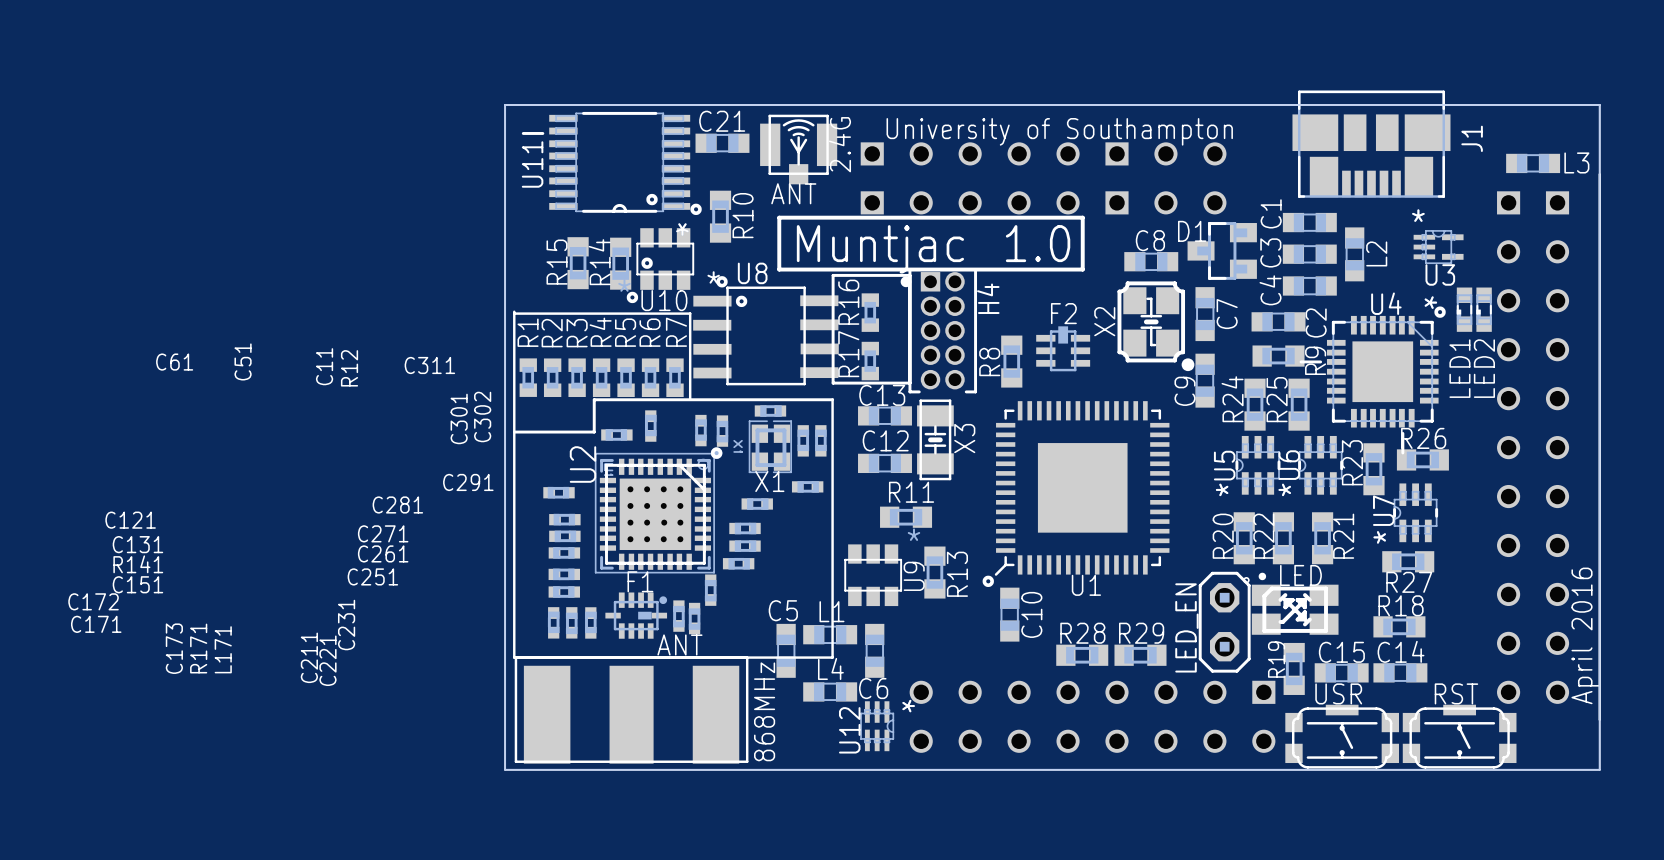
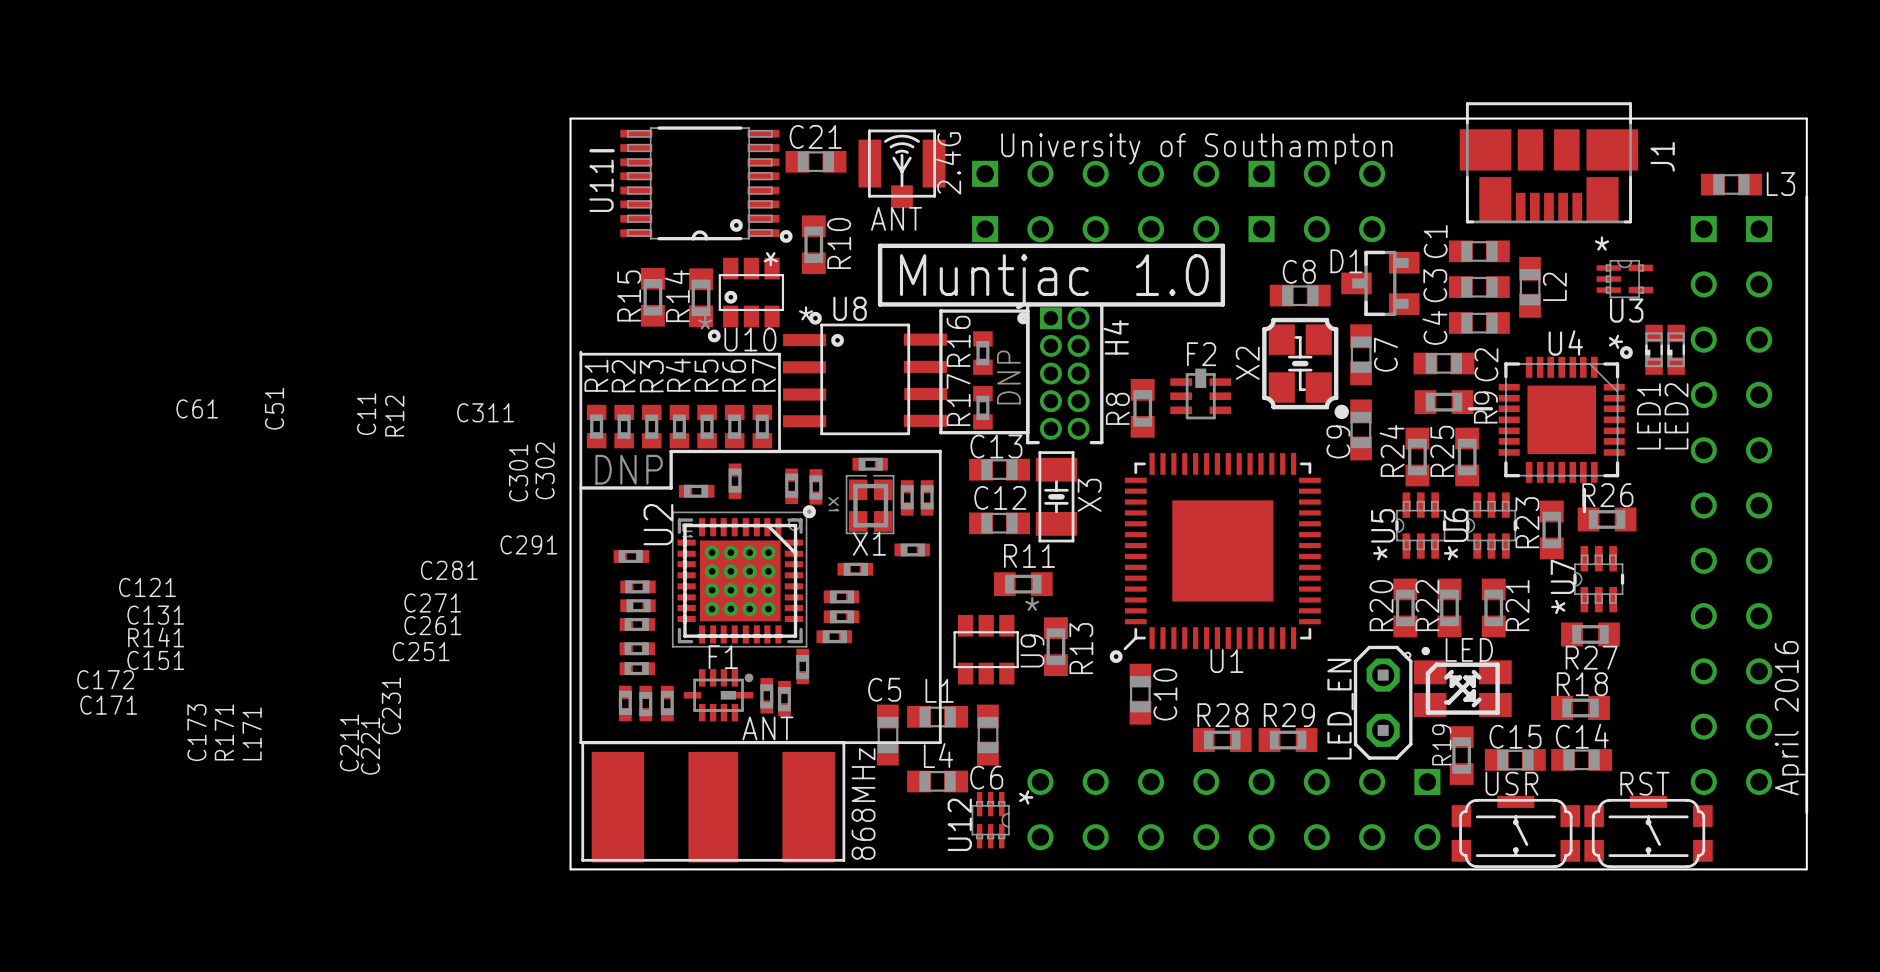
R17 value: none -> DNP (1008, 377)
R7 value: none -> DNP (629, 469)

